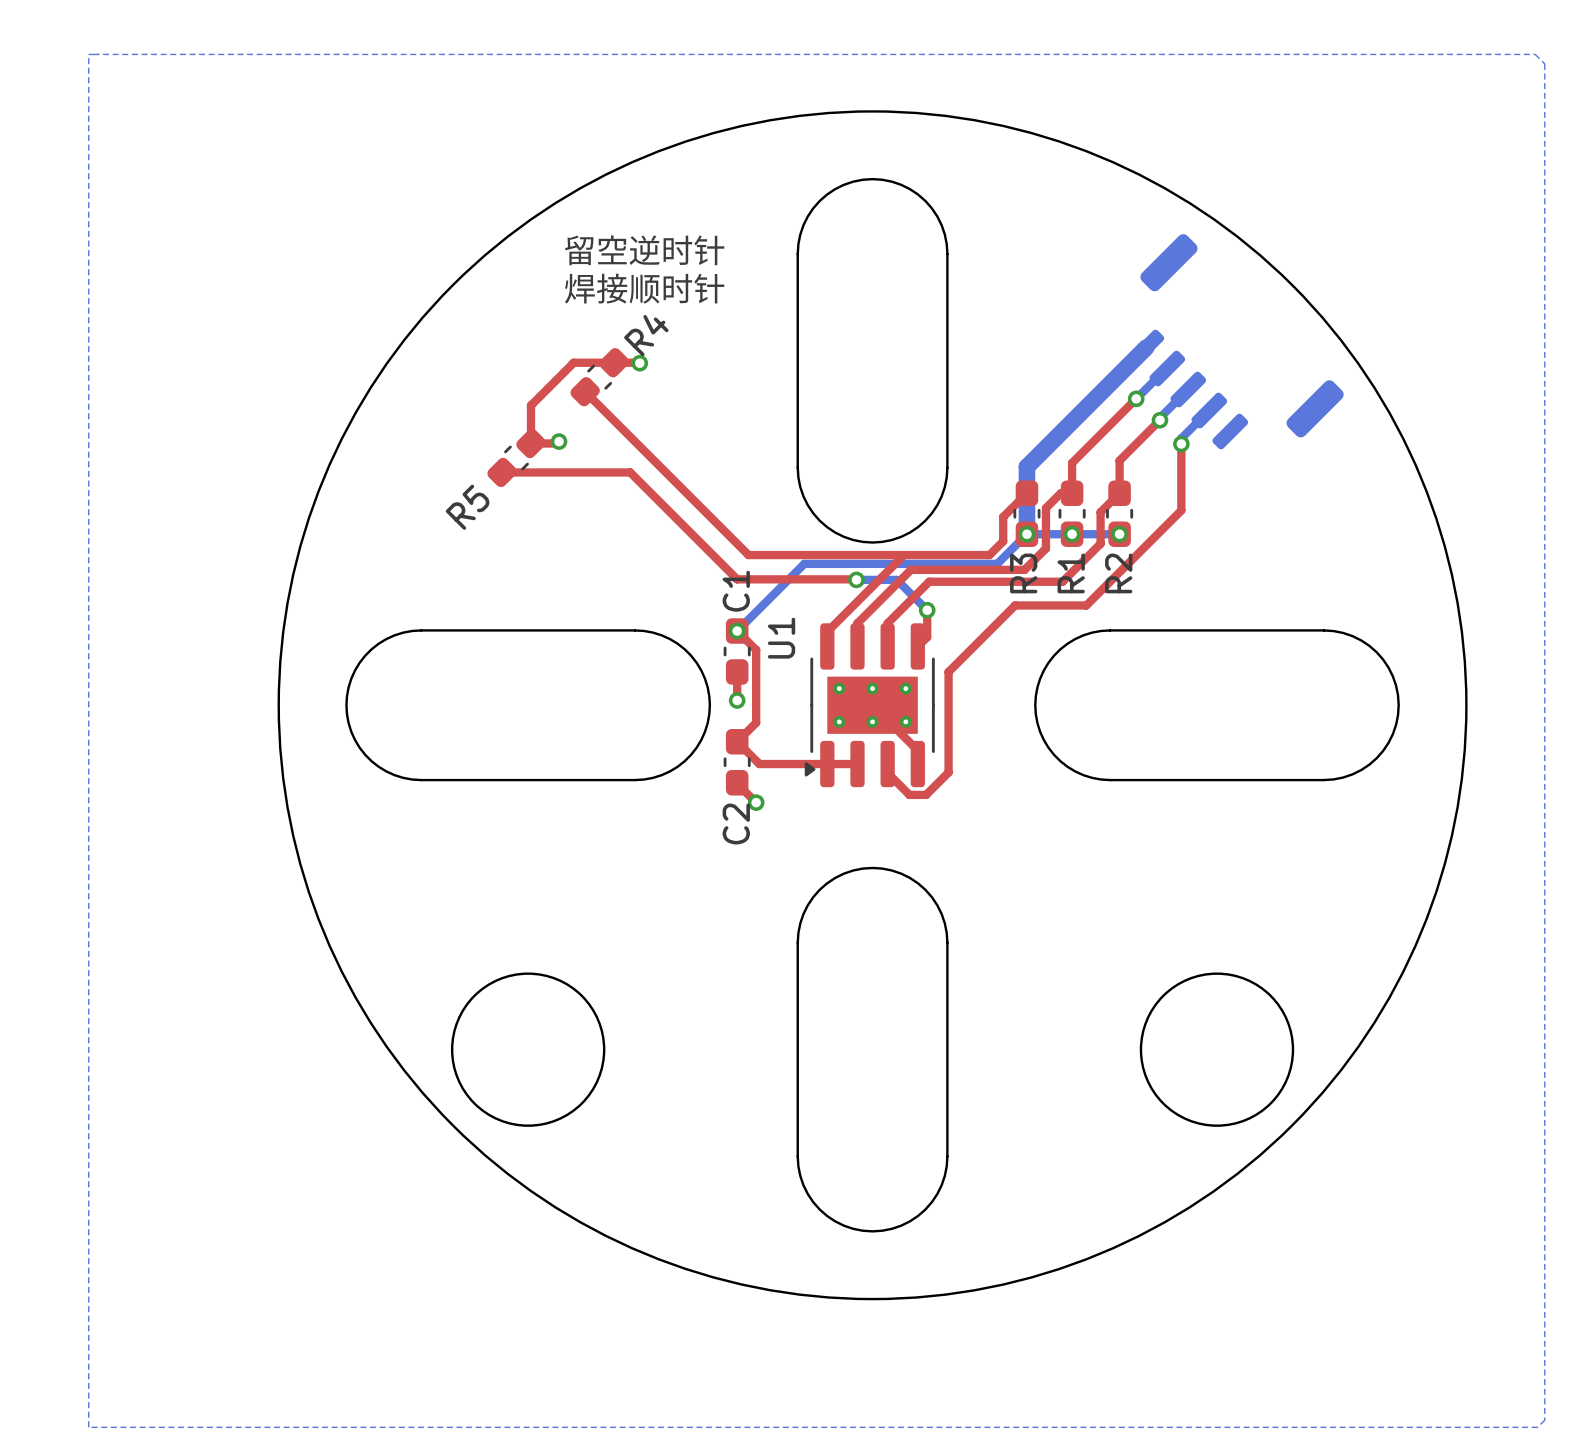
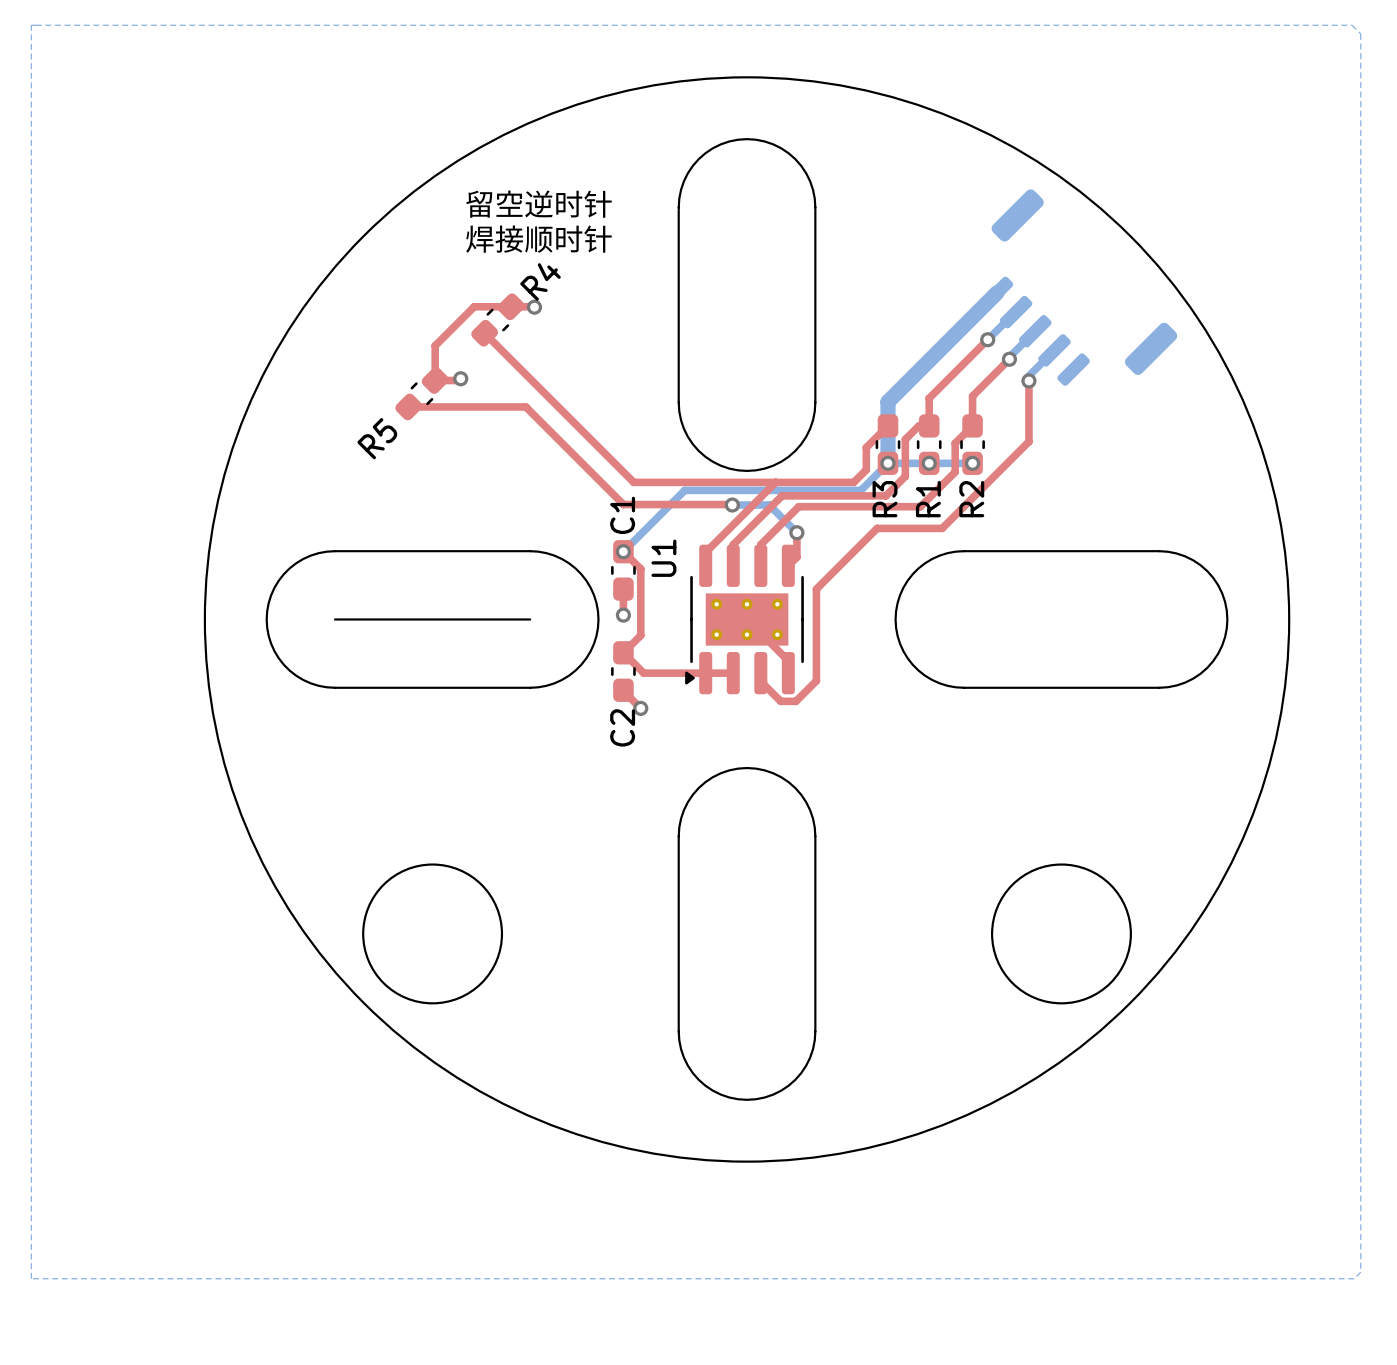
board edge: none -> (335, 619) (530, 619)

